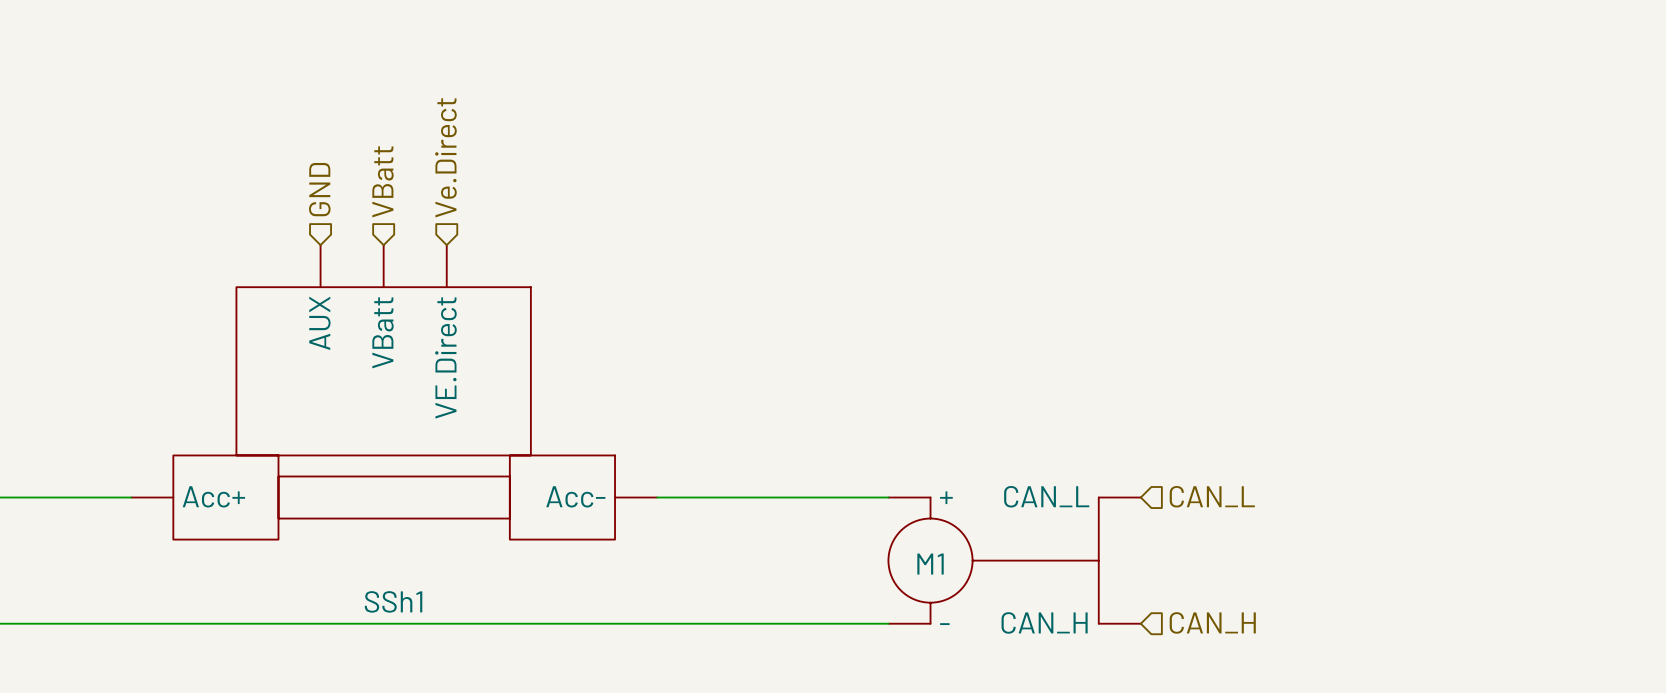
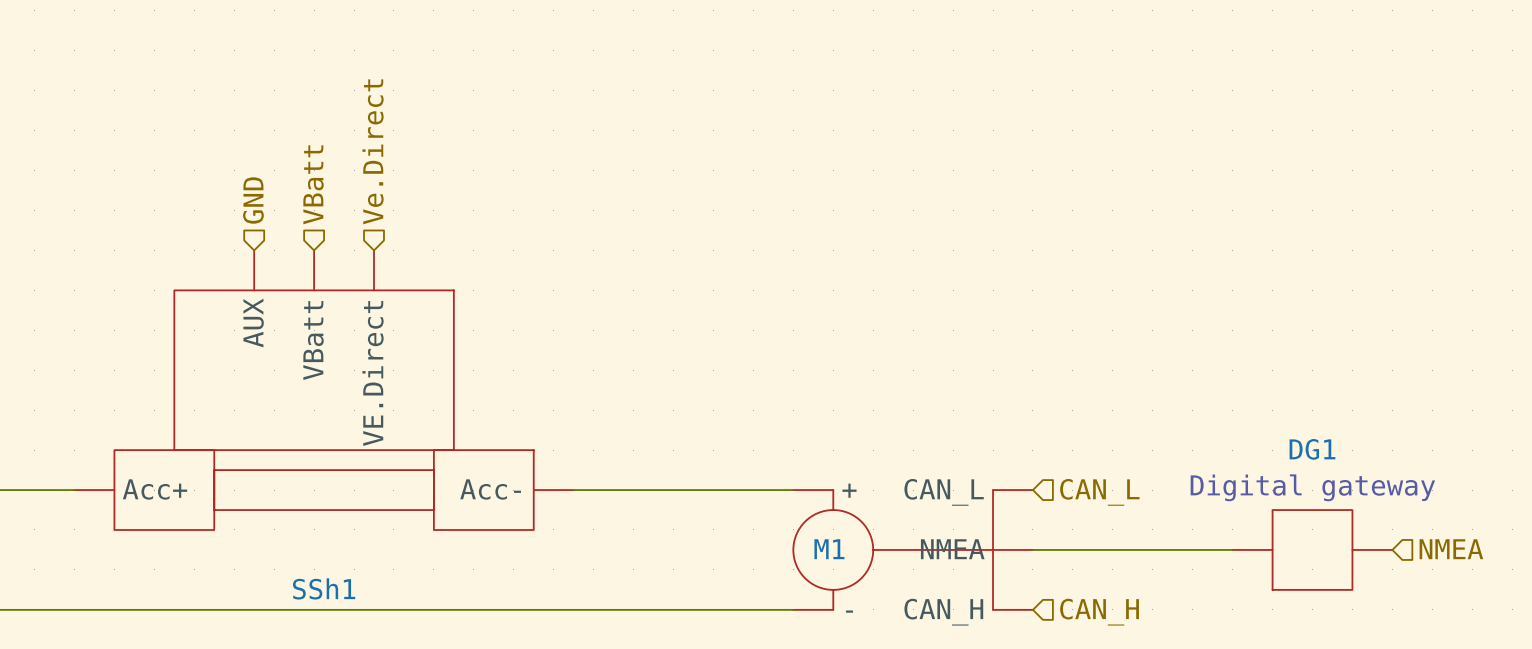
text: none -> Digital gateway (1312, 487)
M1 symbol: [888, 497, 1141, 624] -> [793, 490, 1033, 610]
hierarchical label: none -> NMEA (1451, 549)
wire: none -> (1032, 549) (1232, 549)
DG1: none -> (1312, 549)

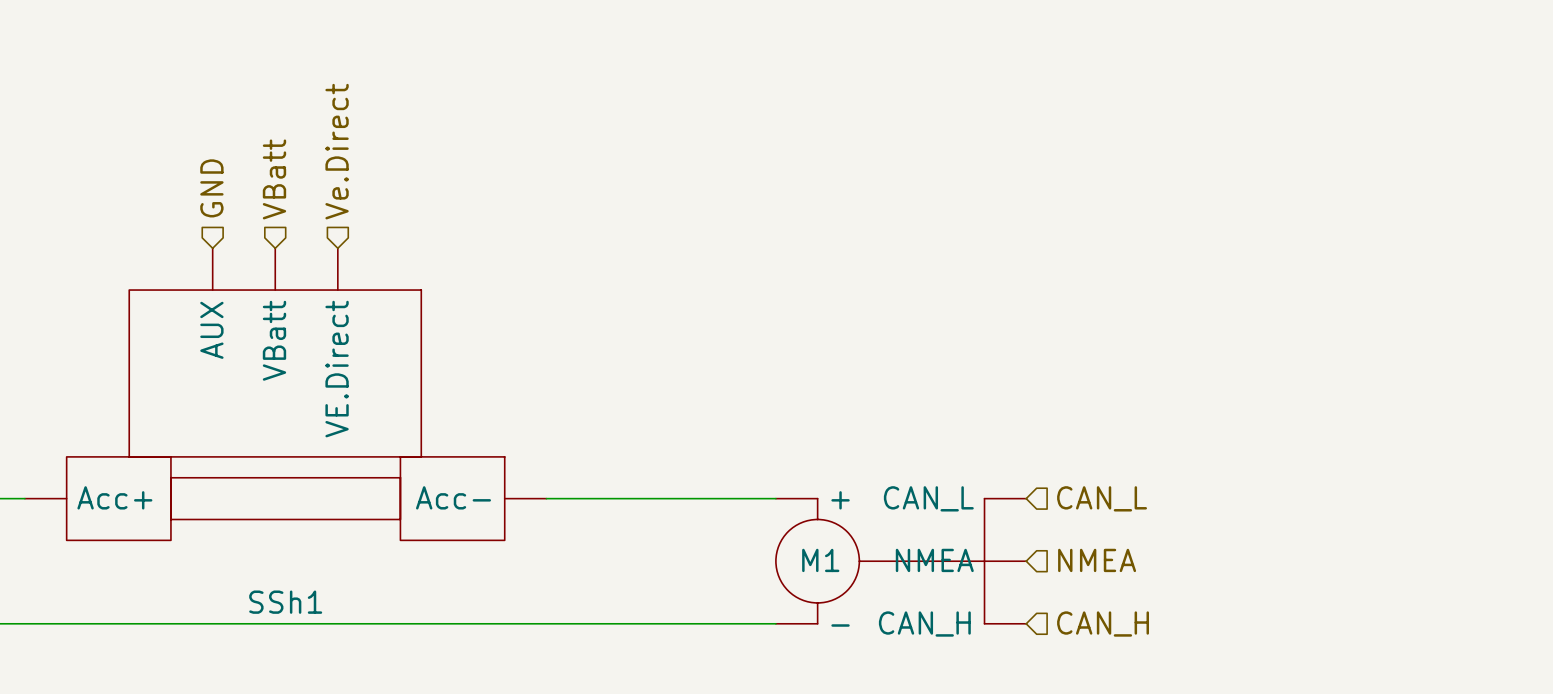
text: Digital gateway (1312, 487) -> none
wire: (1032, 549) (1232, 549) -> none
DG1: (1312, 549) -> none
hierarchical label position: NMEA (1451, 549) -> NMEA (1097, 560)

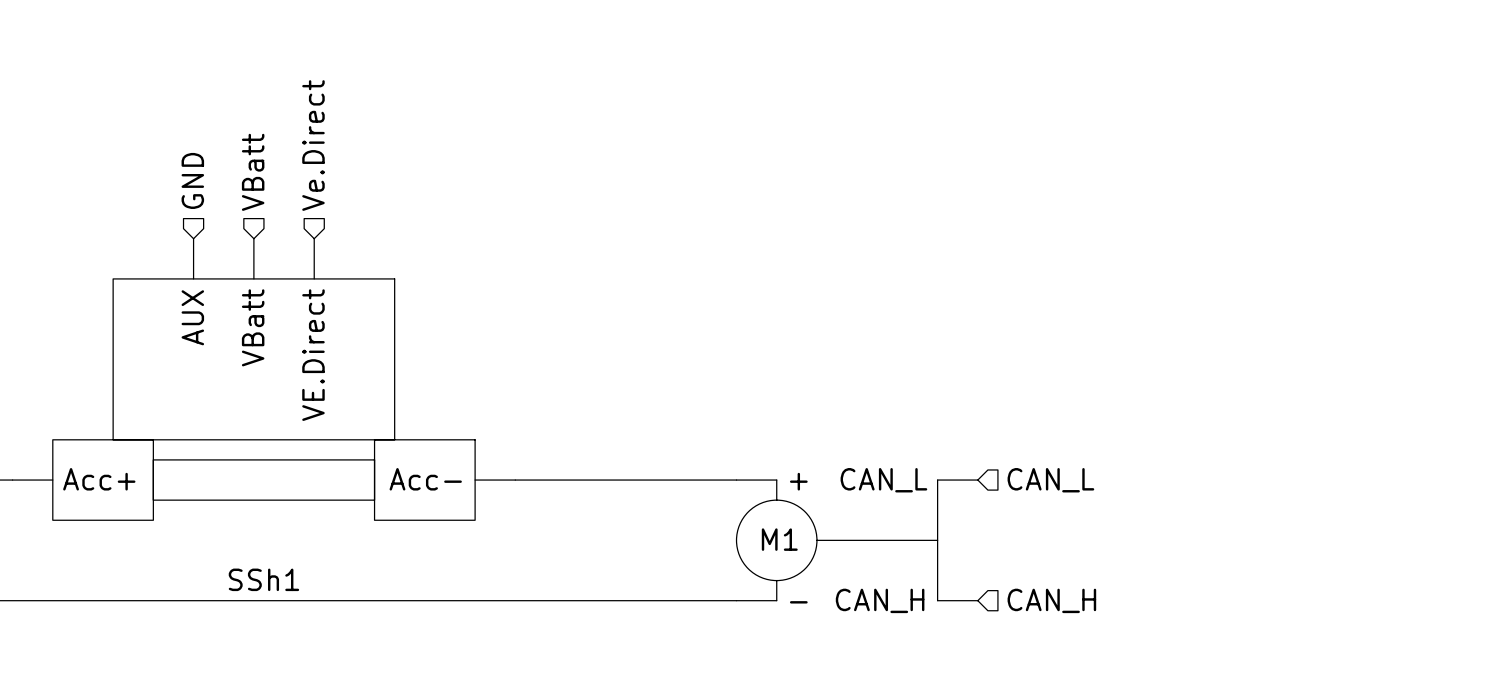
M1 symbol: [775, 498, 1027, 624] -> [736, 480, 978, 601]
hierarchical label: NMEA (1097, 560) -> none

